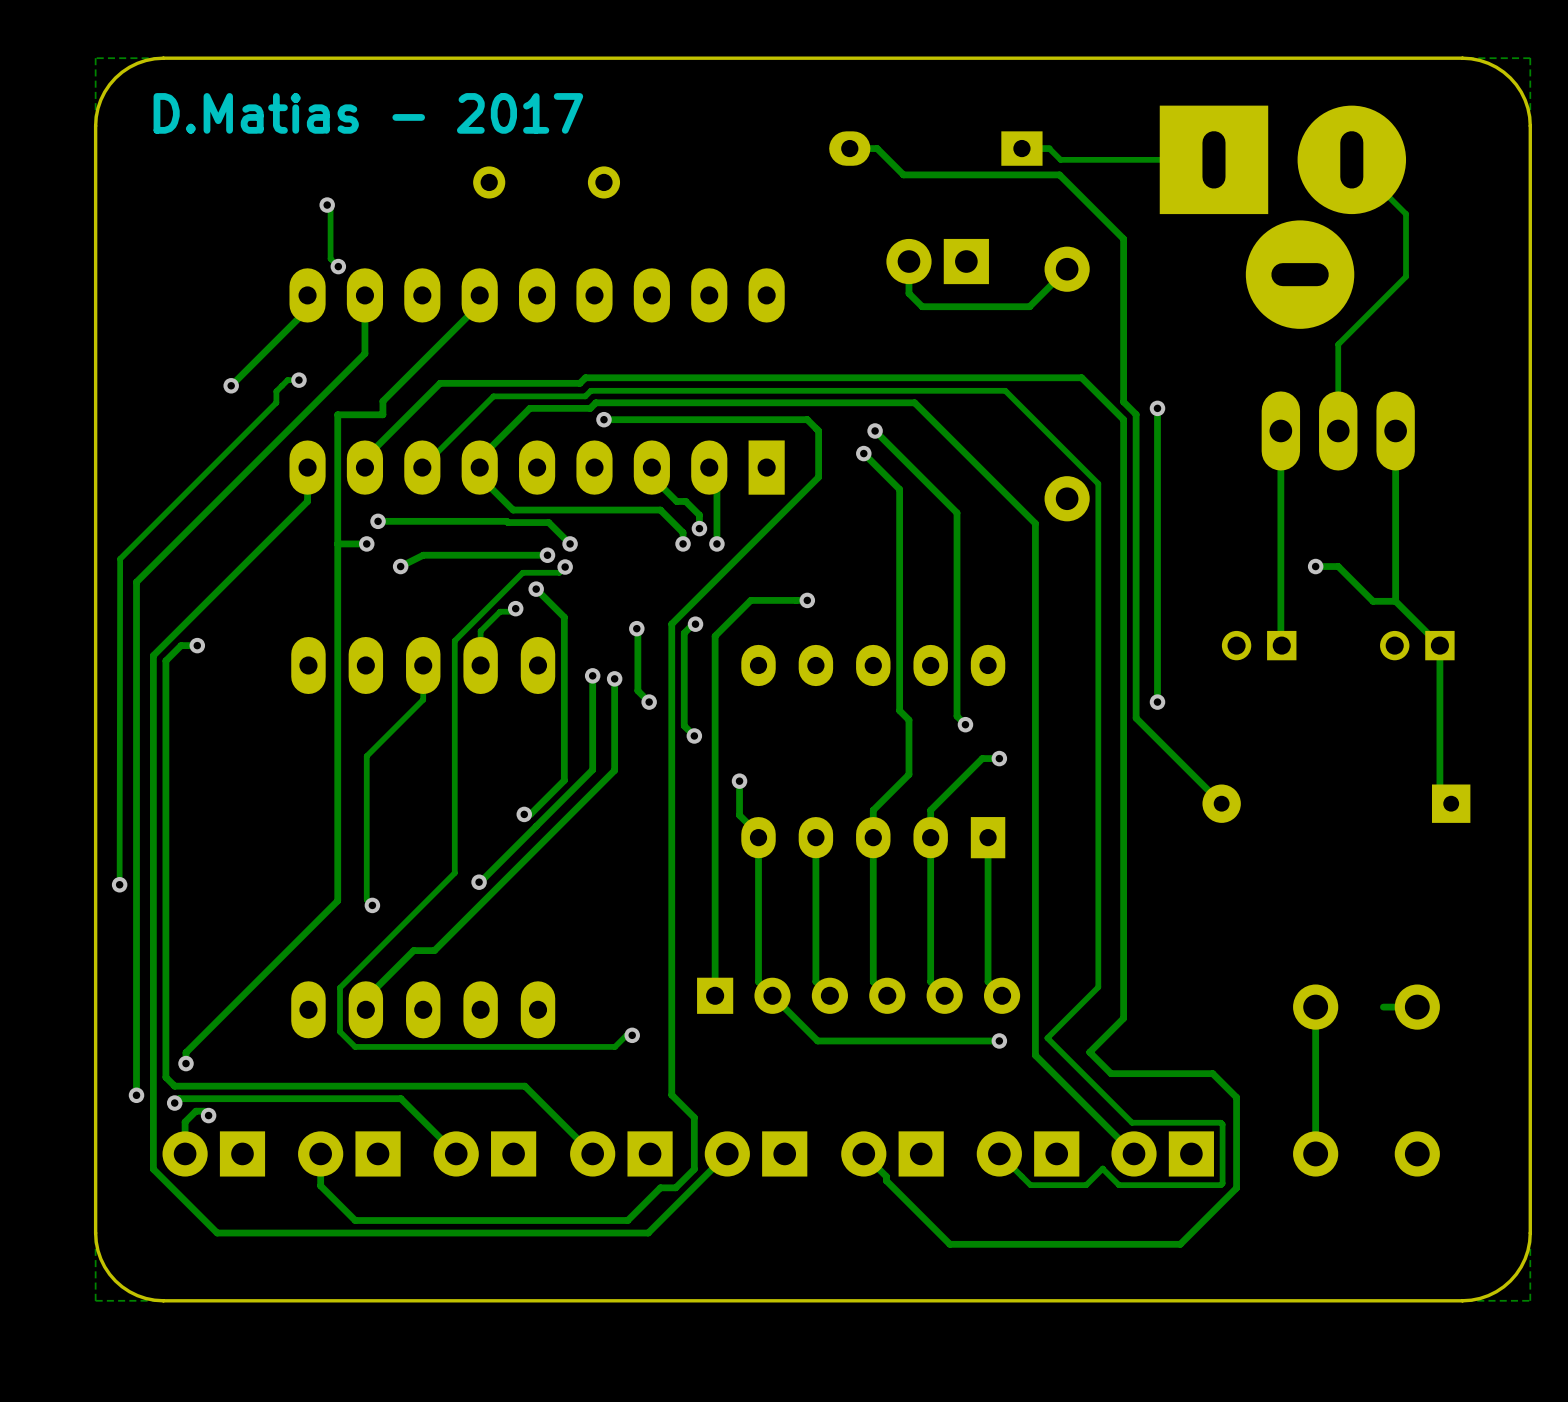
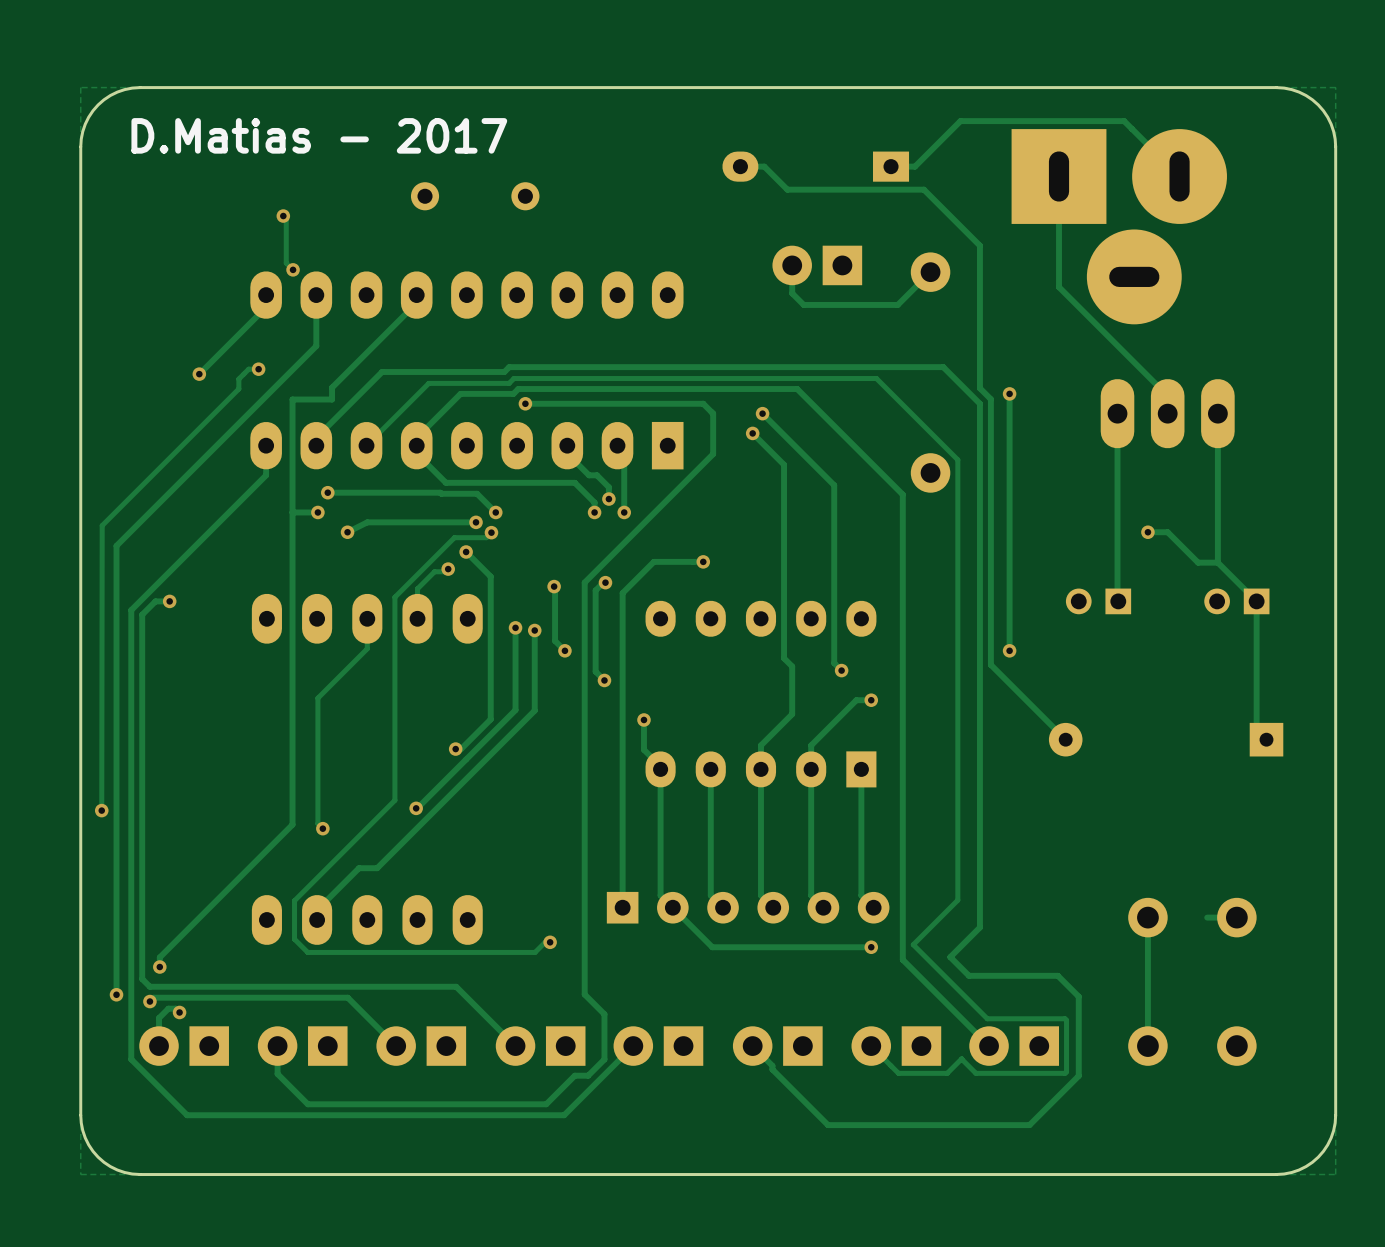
track: (1049, 148) (1060, 159) (1213, 159) -> (914, 166) (960, 121) (1124, 121) (1179, 176)
track: none -> (1059, 176) (1059, 287) (1167, 395)
track: (1351, 159) (1406, 214) (1406, 276) (1338, 344) (1338, 430) -> none

